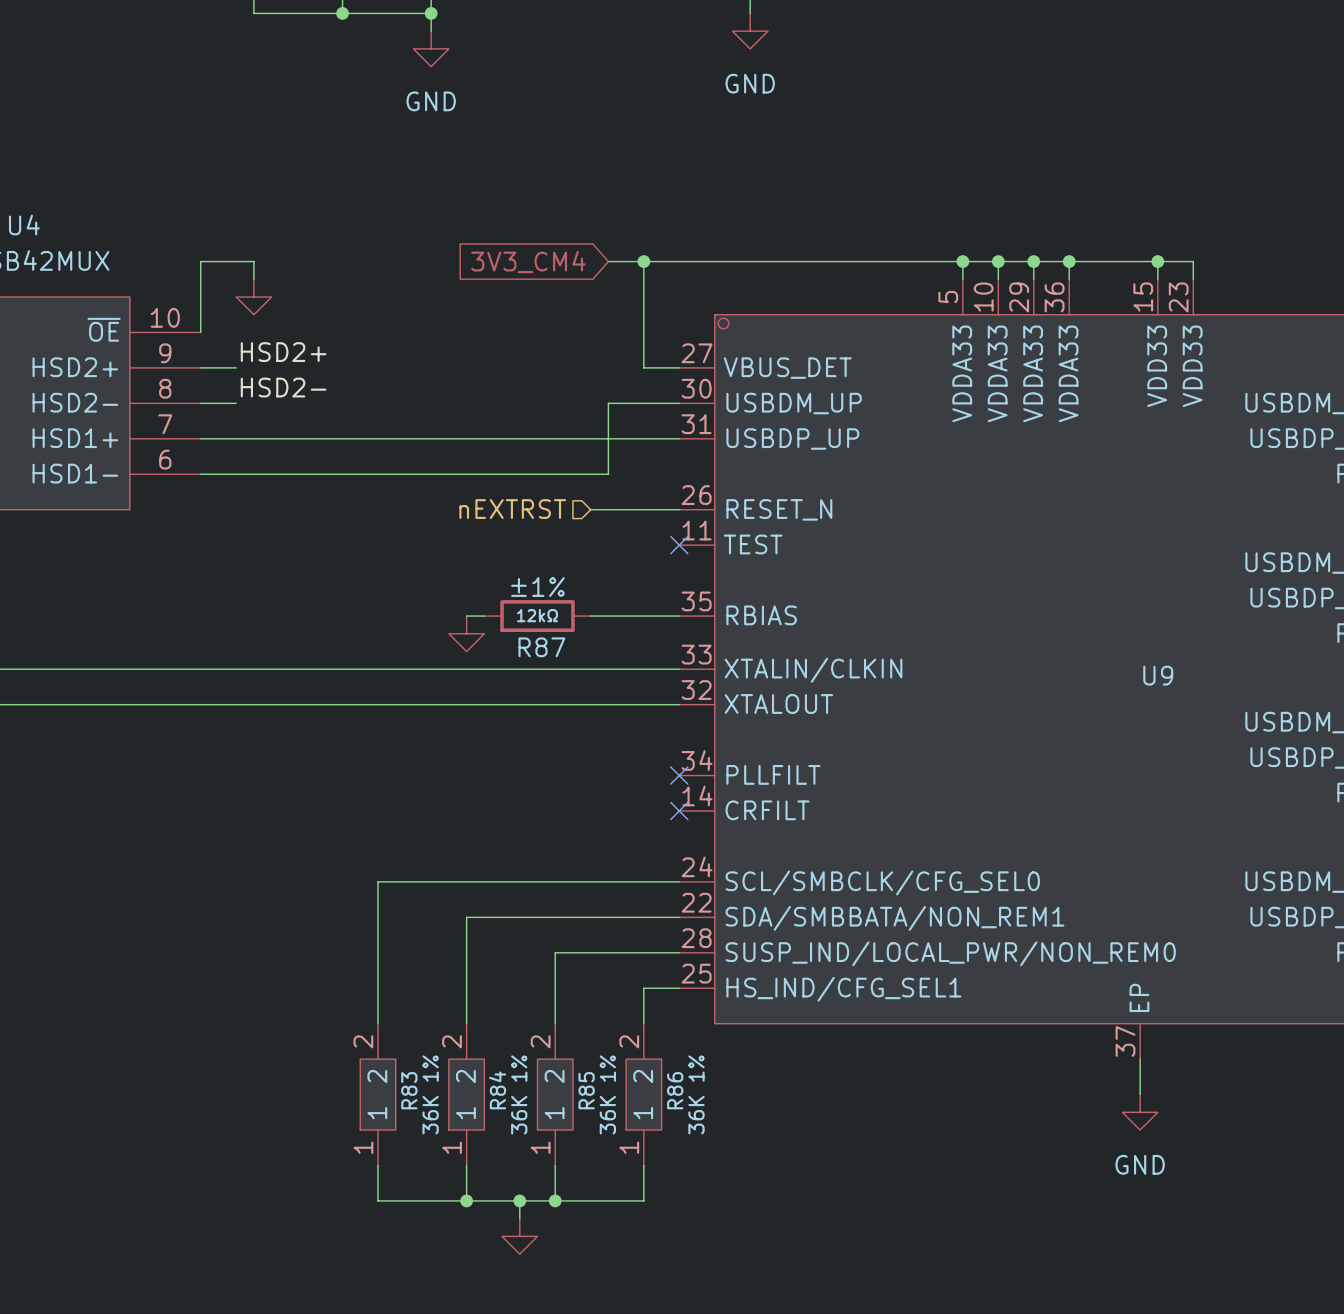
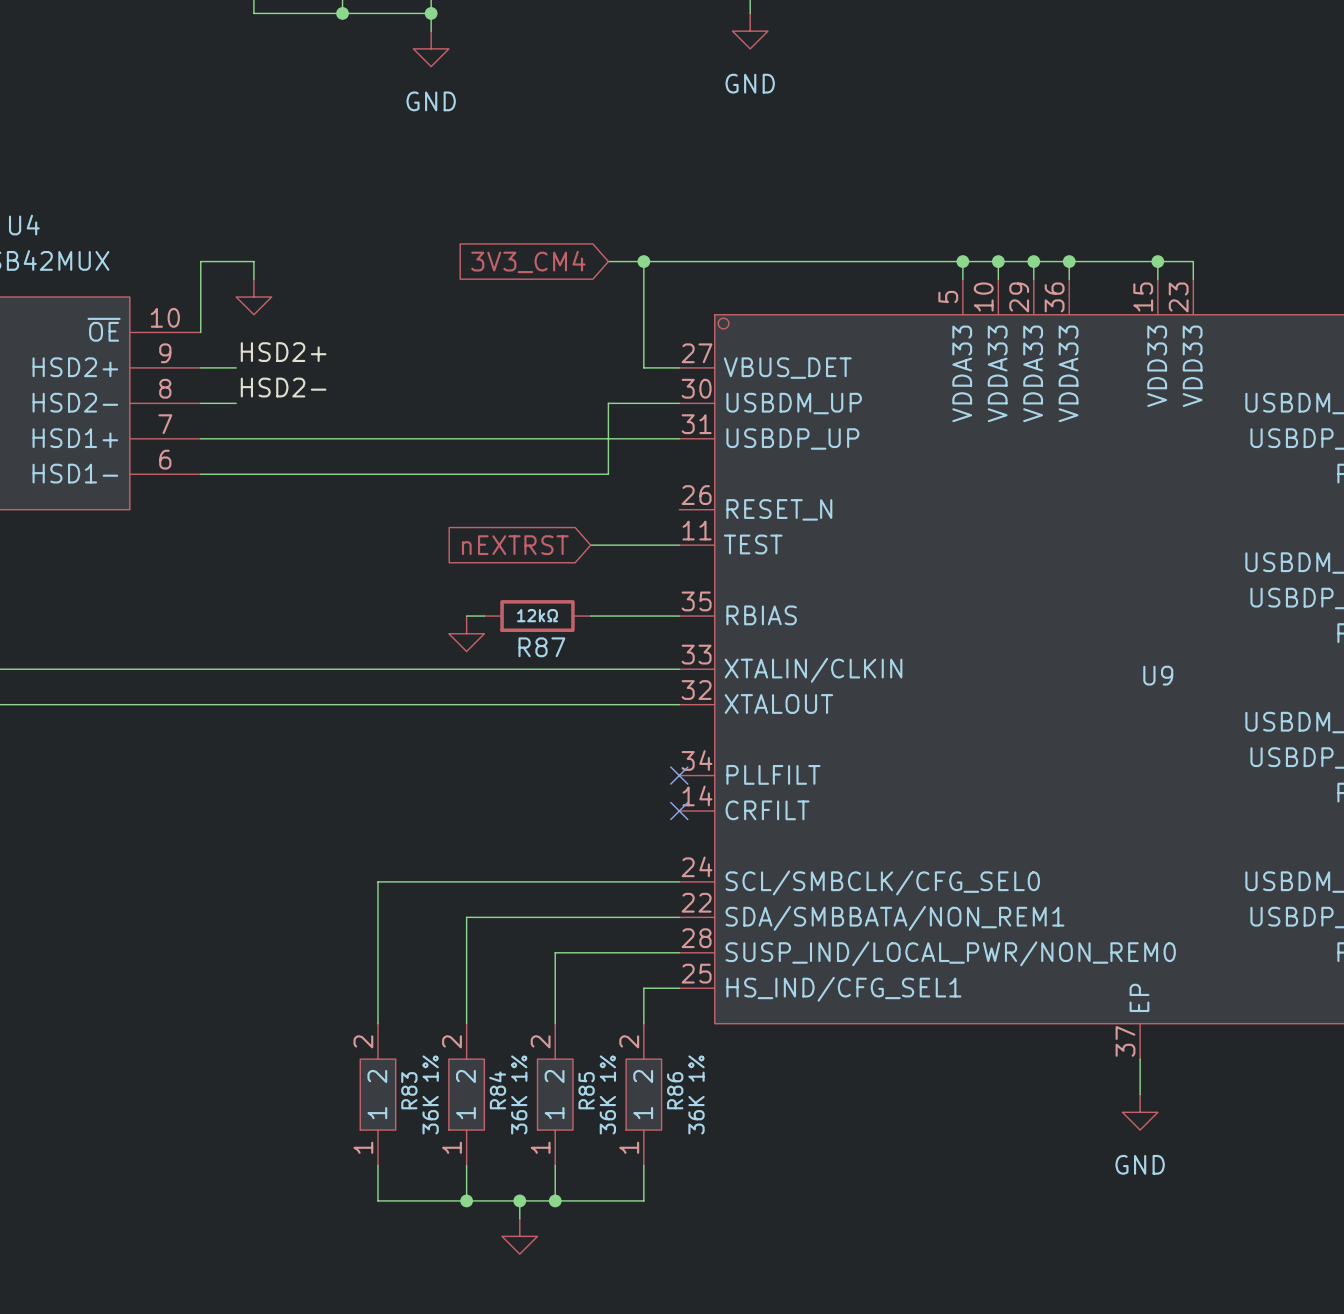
hierarchical label: nEXTRST (512, 509) -> none
wire: (590, 509) (679, 509) -> (590, 545) (679, 545)
global label: none -> nEXTRST (515, 545)
no-connect mark: (679, 545) -> none
R87 text: ±1% (537, 587) -> none

